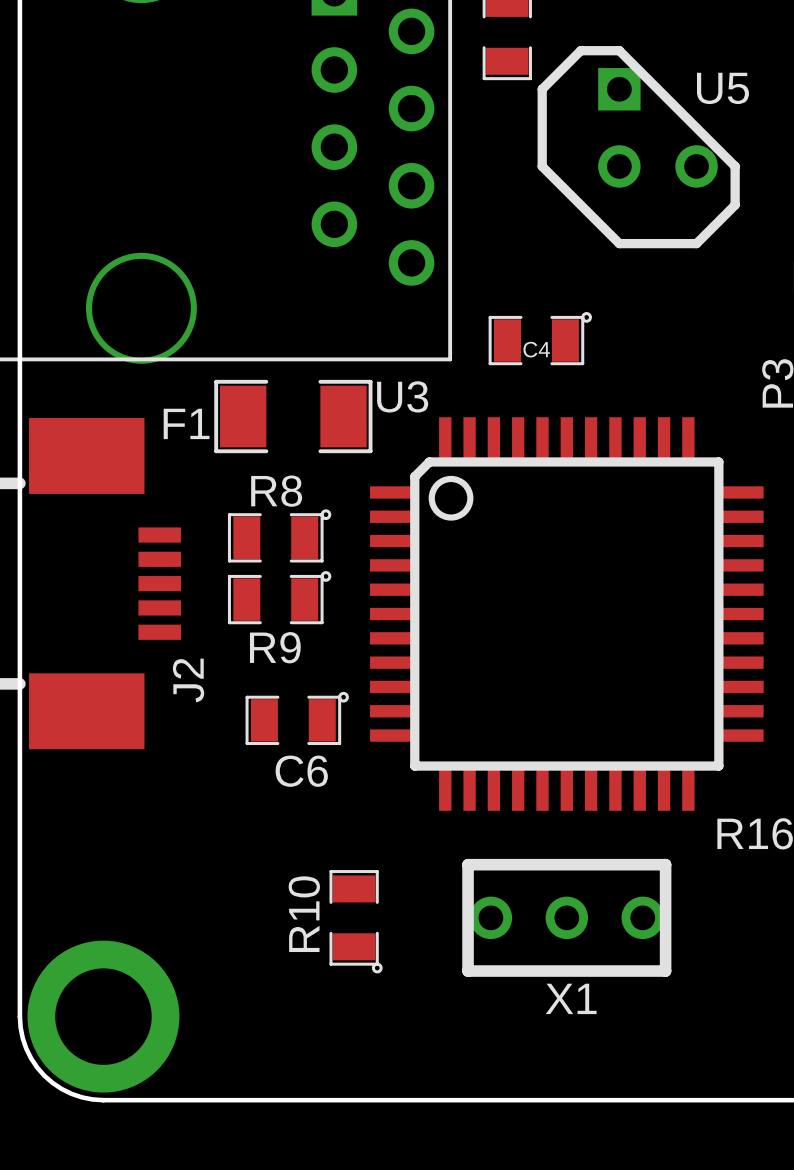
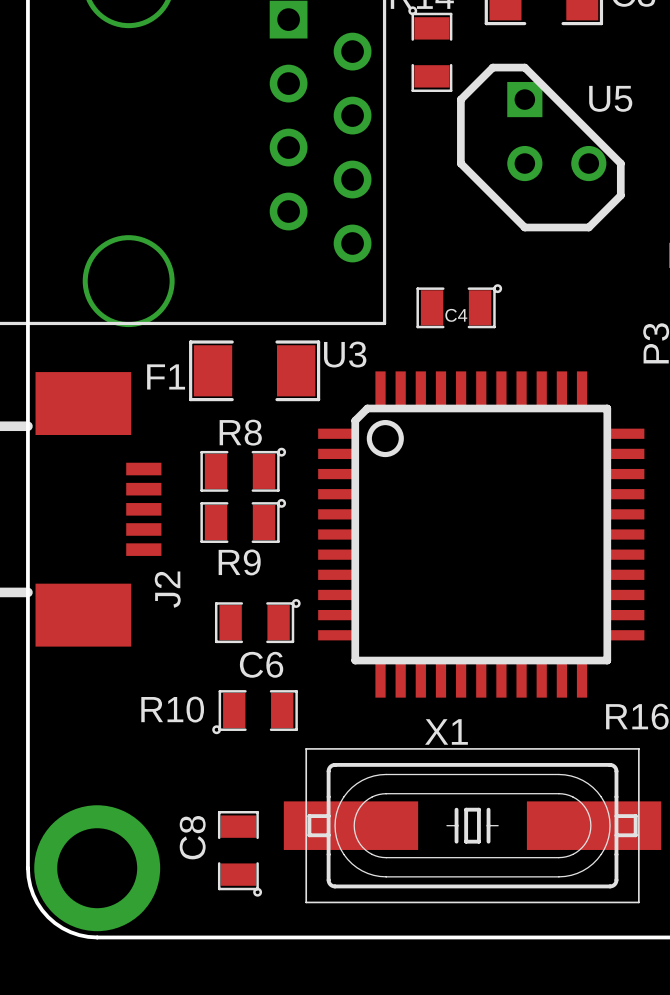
X1 footprint: [462, 858, 672, 977] -> [283, 748, 662, 904]
R10 rotation: 0° (356, 921) -> 90° clockwise (255, 712)
R10 position: (356, 921) -> (255, 712)
X1 name position: X1 (571, 998) -> X1 (446, 731)
C8: none -> (240, 853)

